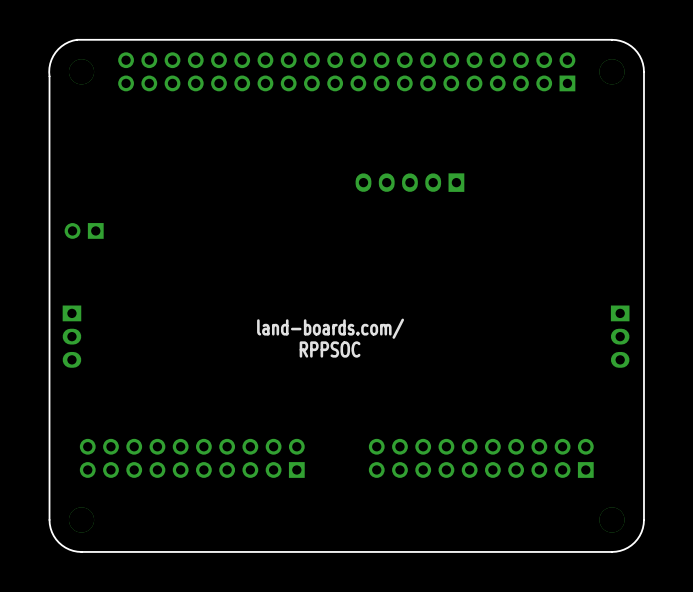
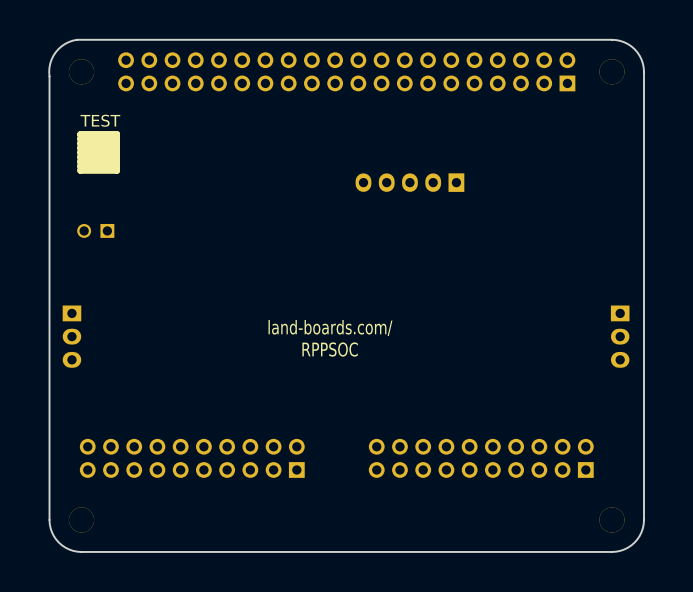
TEST: none -> (98, 152)
part: (84, 230) -> none
part: none -> (95, 230)

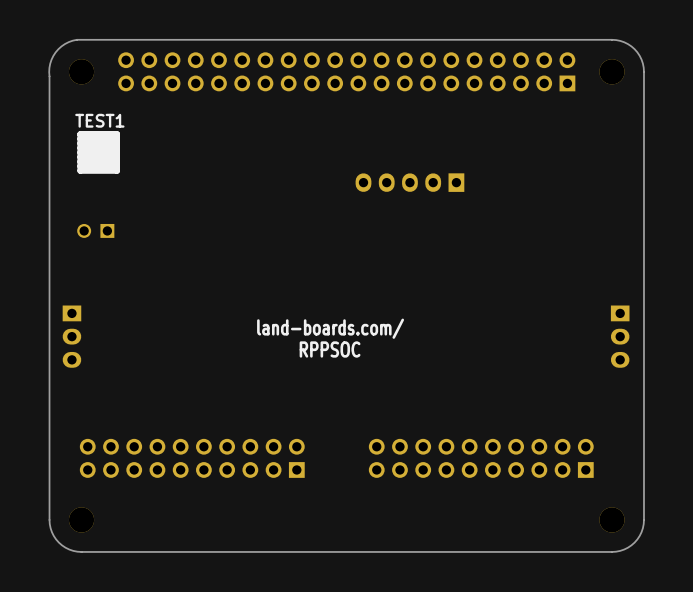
TEST name: TEST (100, 120) -> TEST1 (99, 120)

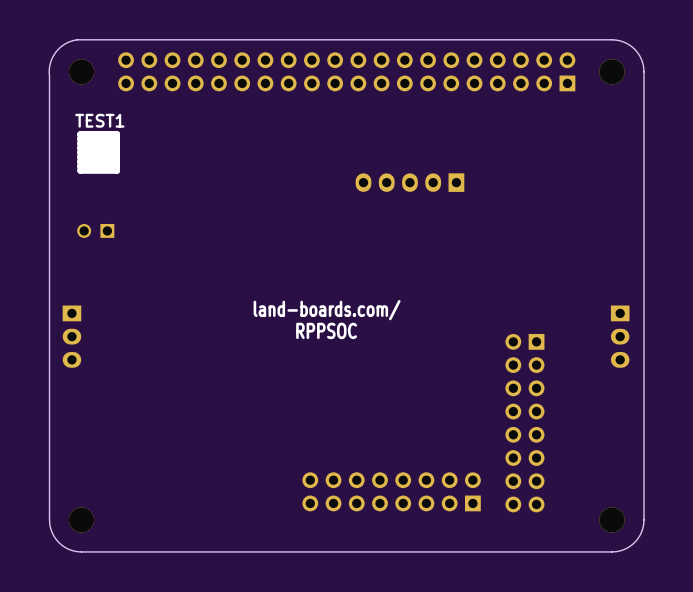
text: none -> land-boards.com/ (327, 310)
text: land-boards.com/ (330, 328) -> RPPSOC (326, 330)
text: RPPSOC (330, 349) -> none
part: none -> (524, 423)
part: (192, 458) -> none
part: (481, 458) -> none
part: none -> (391, 491)

